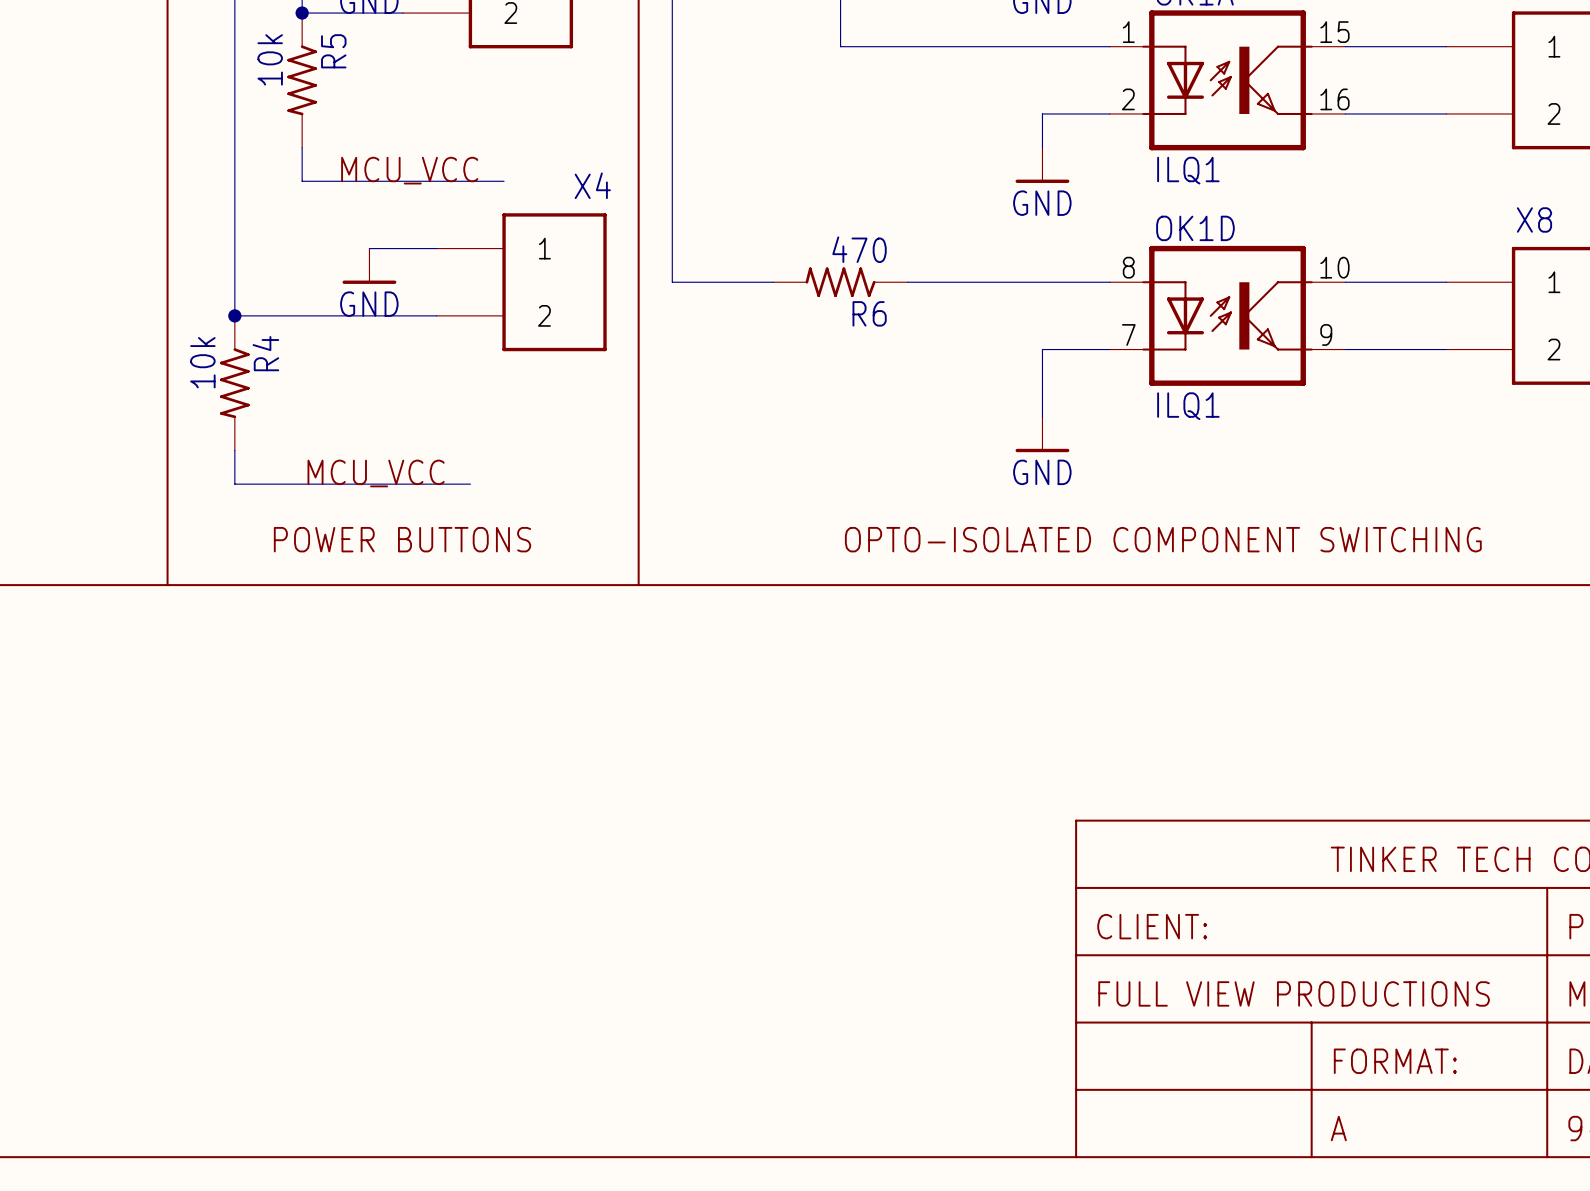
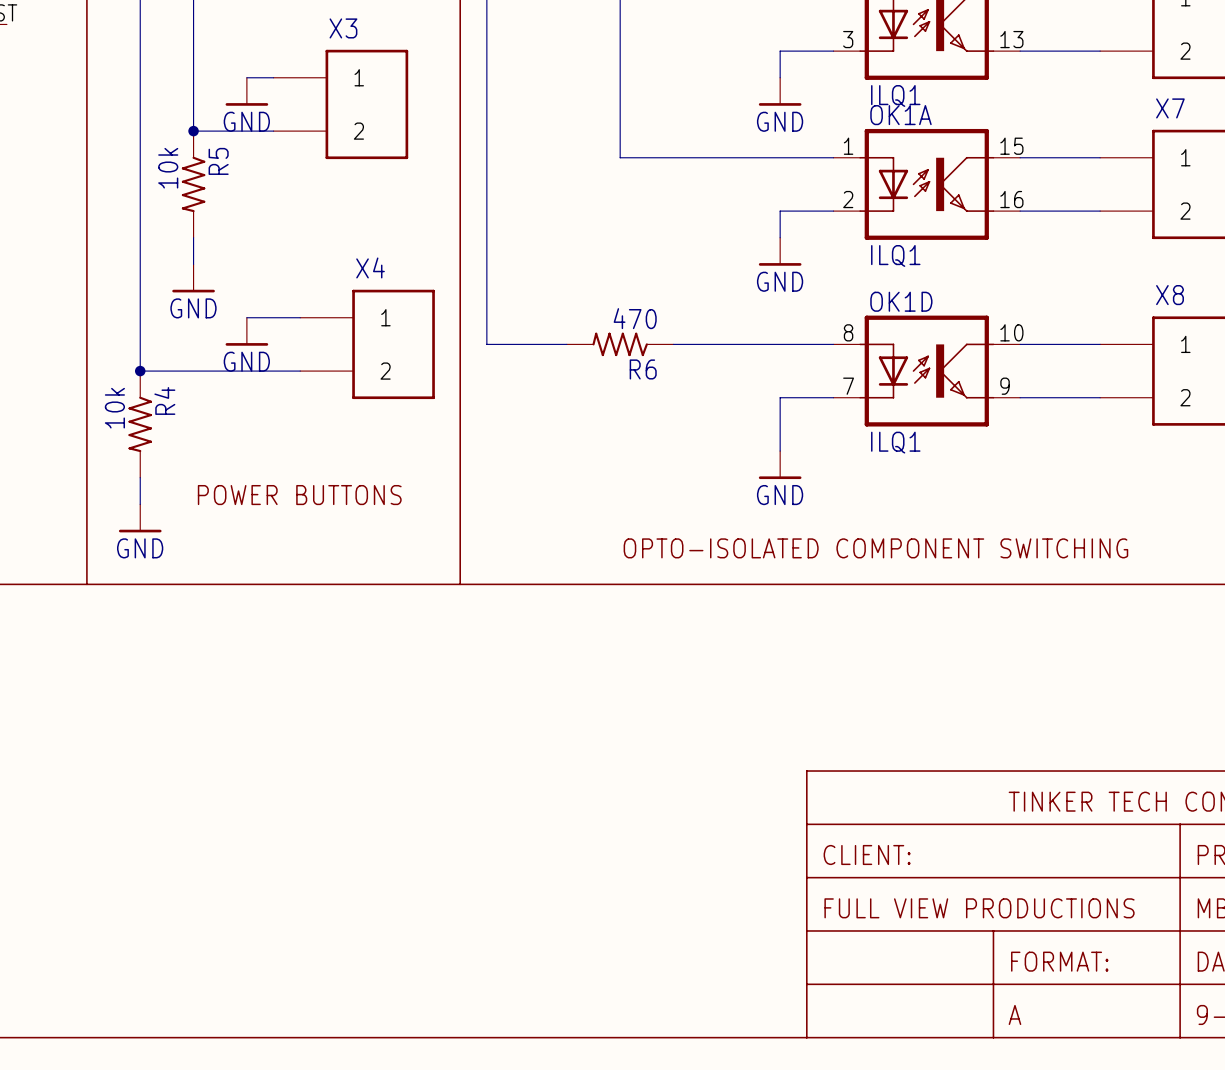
label: MCU_VCC (409, 170) -> none
wire: (302, 181) (504, 181) -> none
X4 name position: X4 (592, 185) -> X4 (370, 267)
power symbol: none -> GND (193, 278)
label: MCU_VCC (376, 473) -> none
wire: (234, 484) (470, 484) -> none
power symbol: none -> GND (140, 518)
text position: POWER BUTTONS (402, 539) -> POWER BUTTONS (299, 495)

